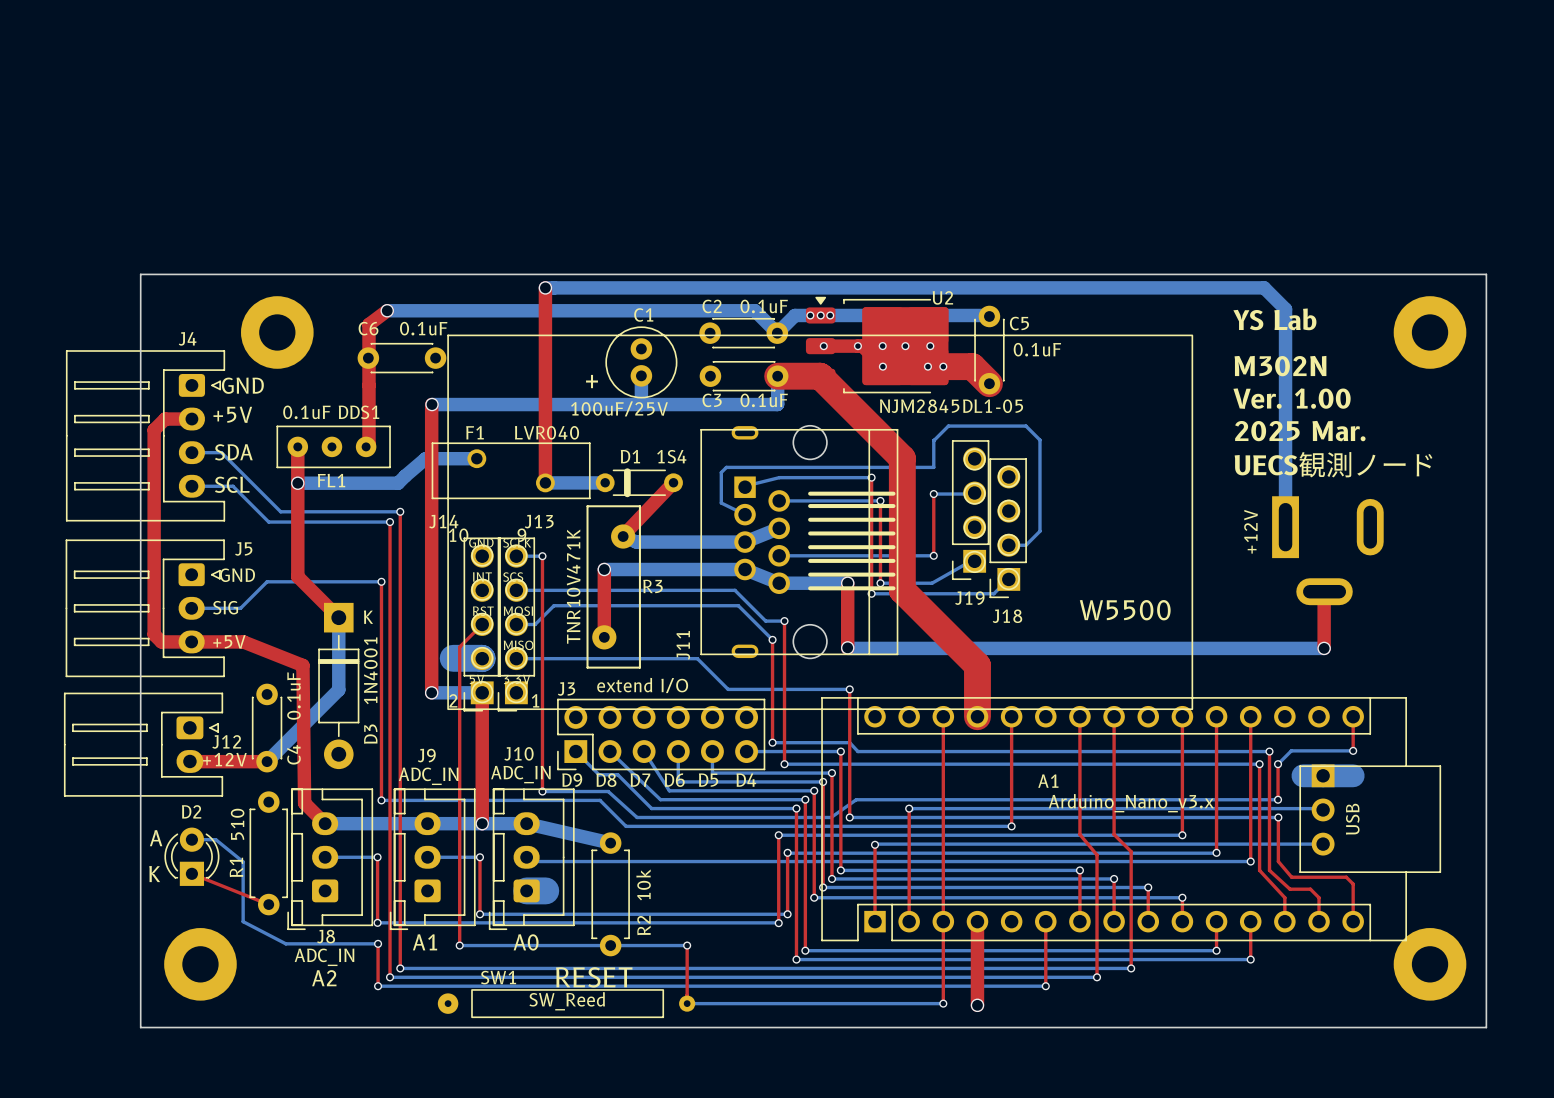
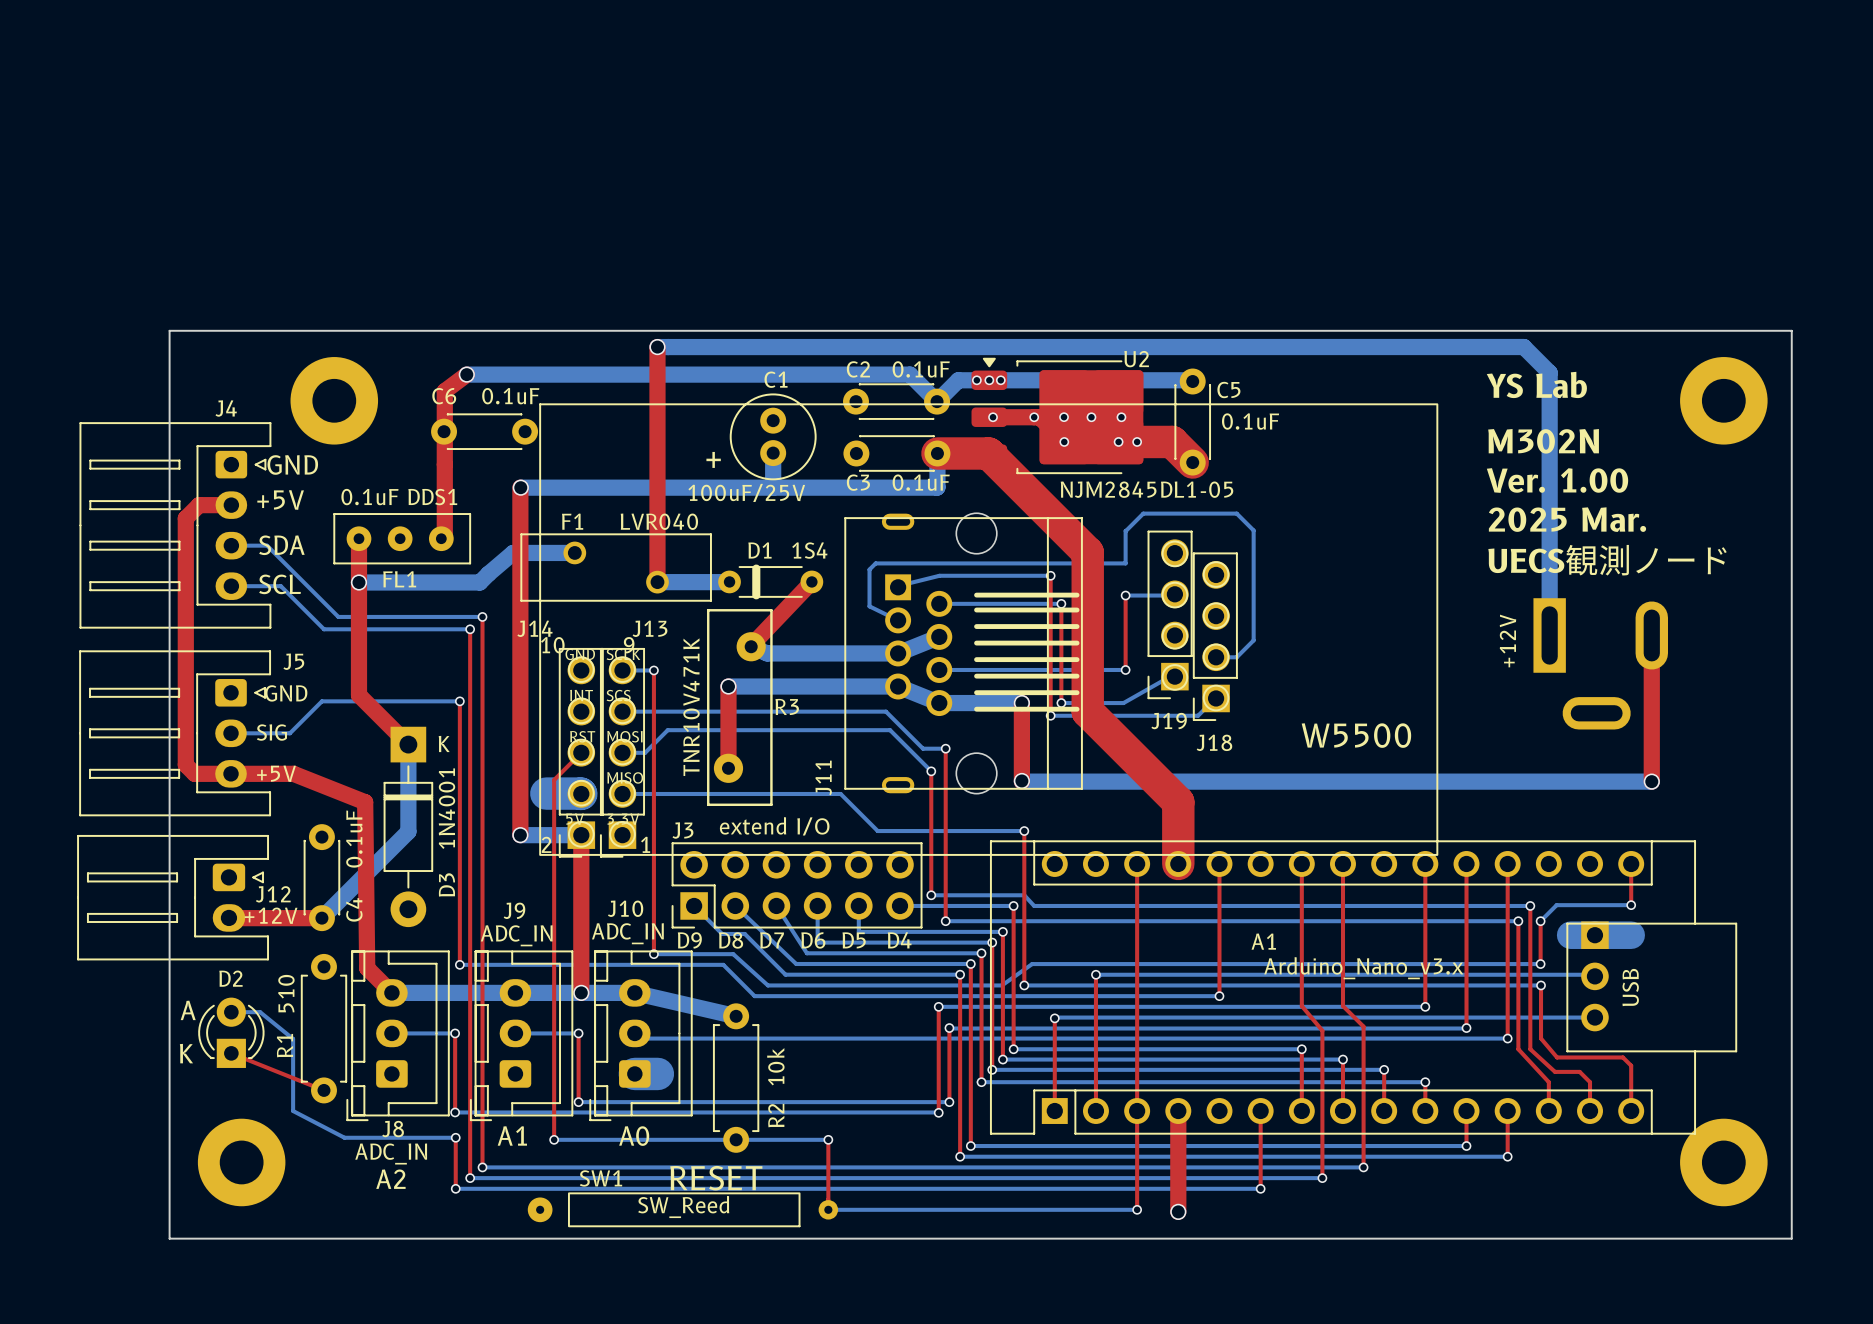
top track: none -> (1651, 635) (1651, 781)
top track: (1324, 591) (1324, 648) -> none
bottom track: none -> (1596, 781) (1651, 781)
via position: (1324, 648) -> (1651, 781)

